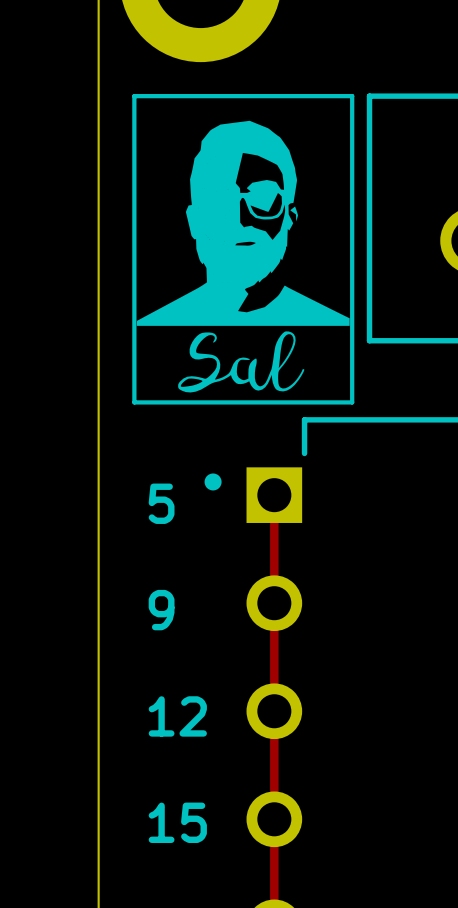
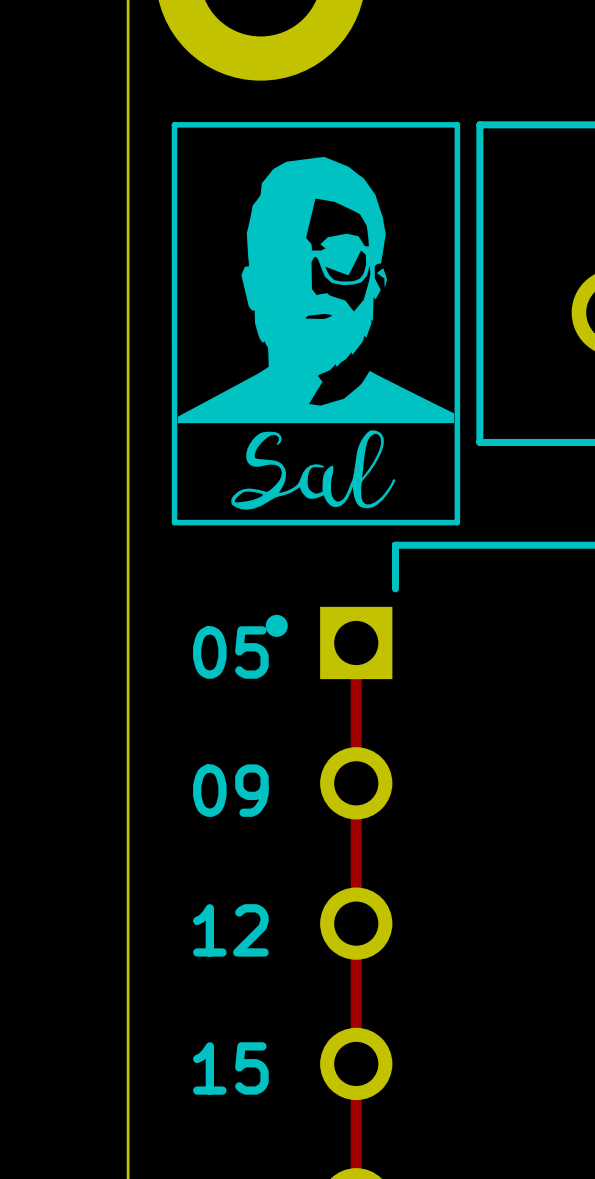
text: 5 (161, 503) -> 05 (230, 652)
text: 9 (161, 610) -> 09 (230, 790)

